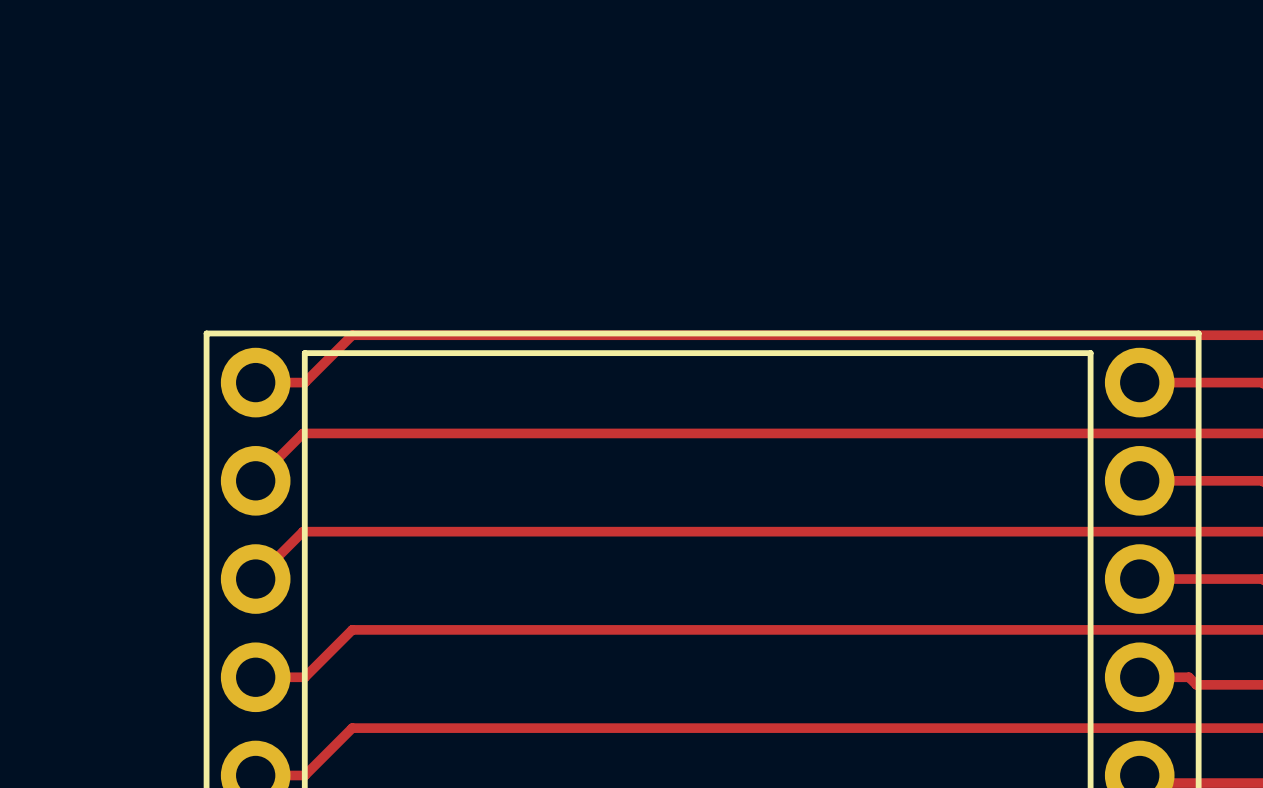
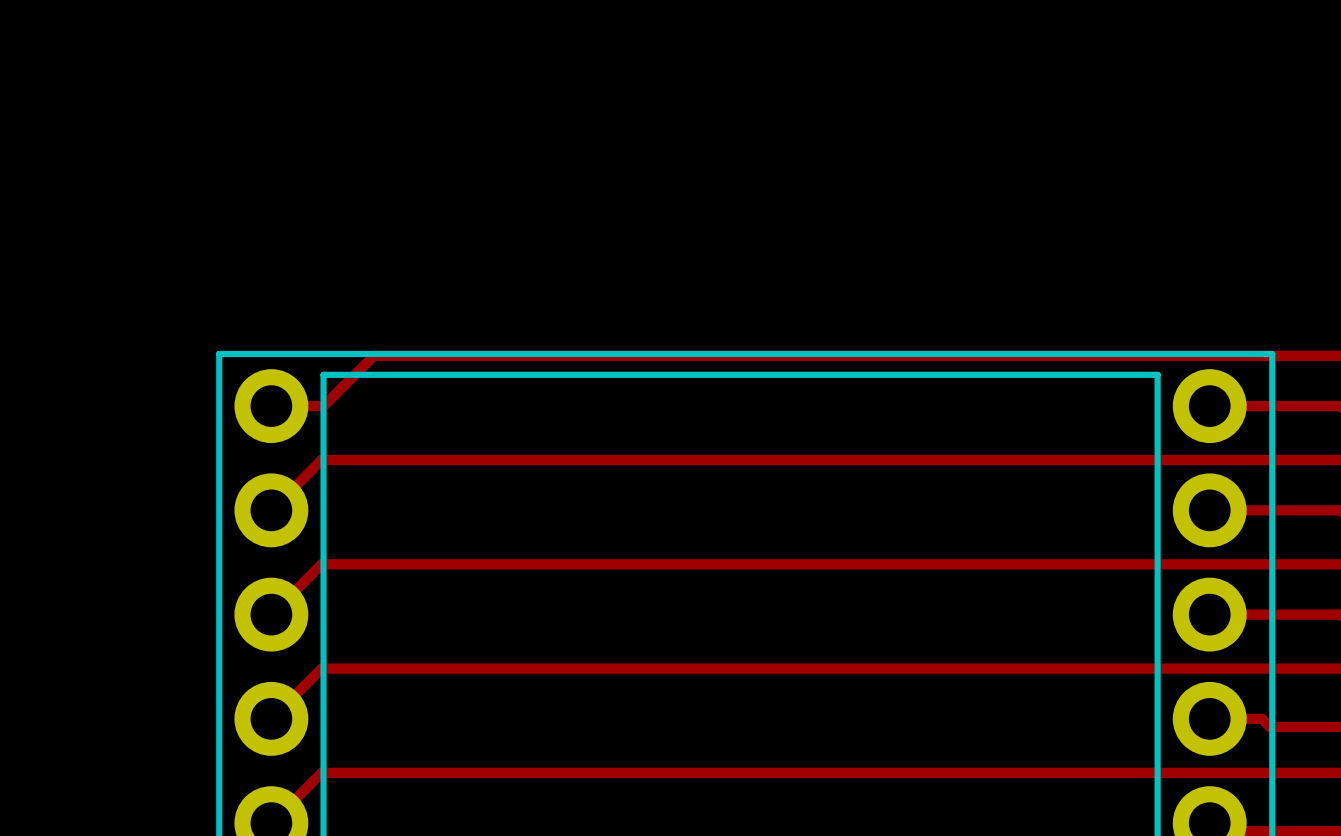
track: (352, 629) (304, 677) (255, 677) -> (373, 668) (321, 668) (271, 718)
track: (352, 728) (304, 775) (255, 775) -> (373, 772) (321, 772) (271, 823)

